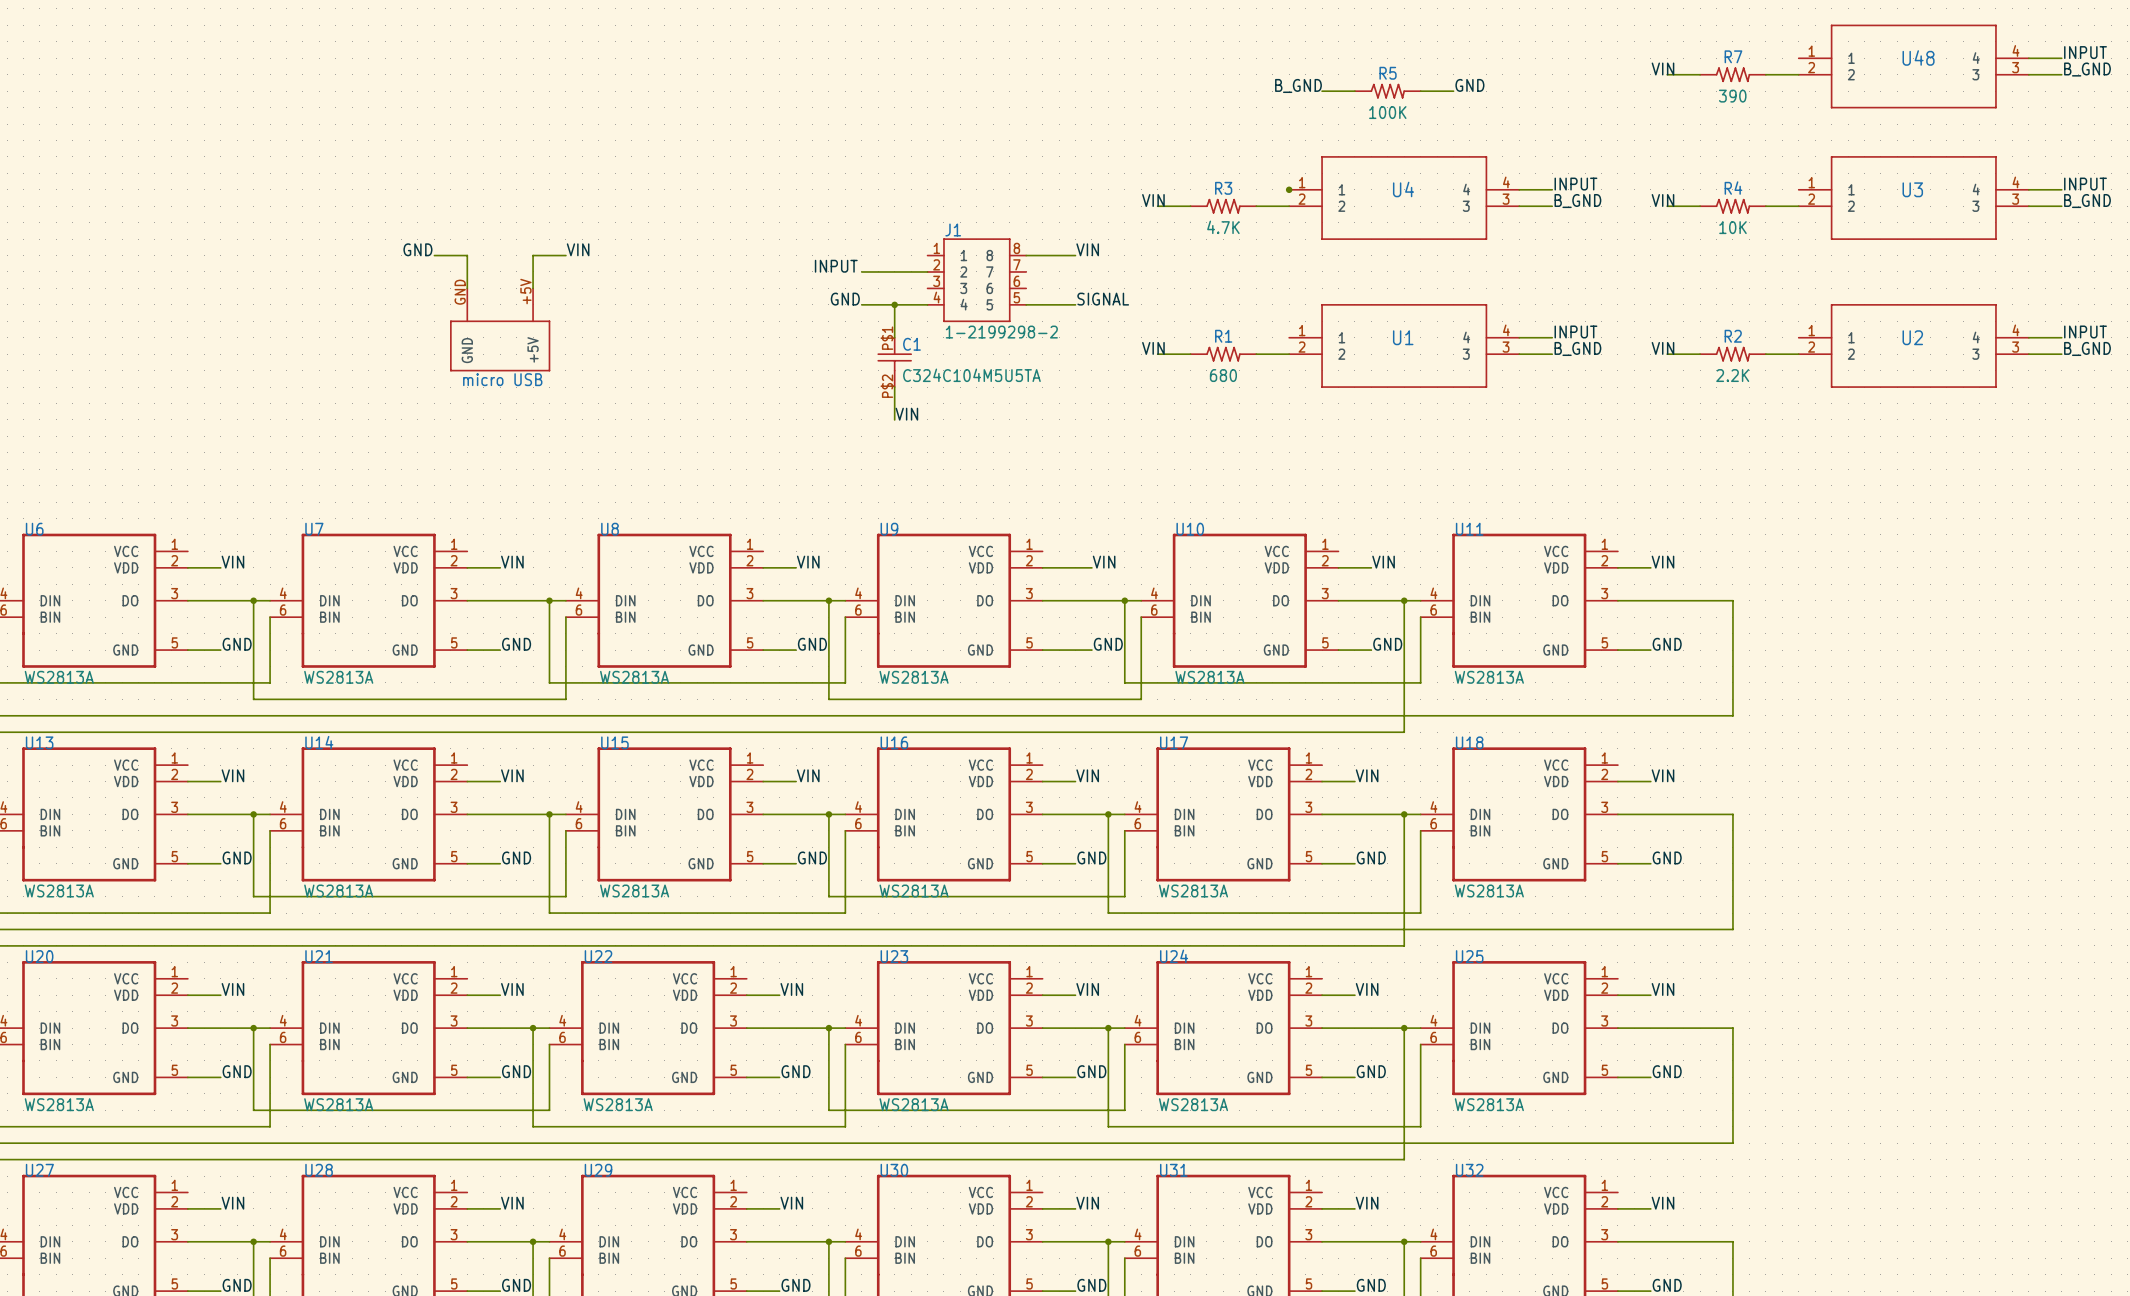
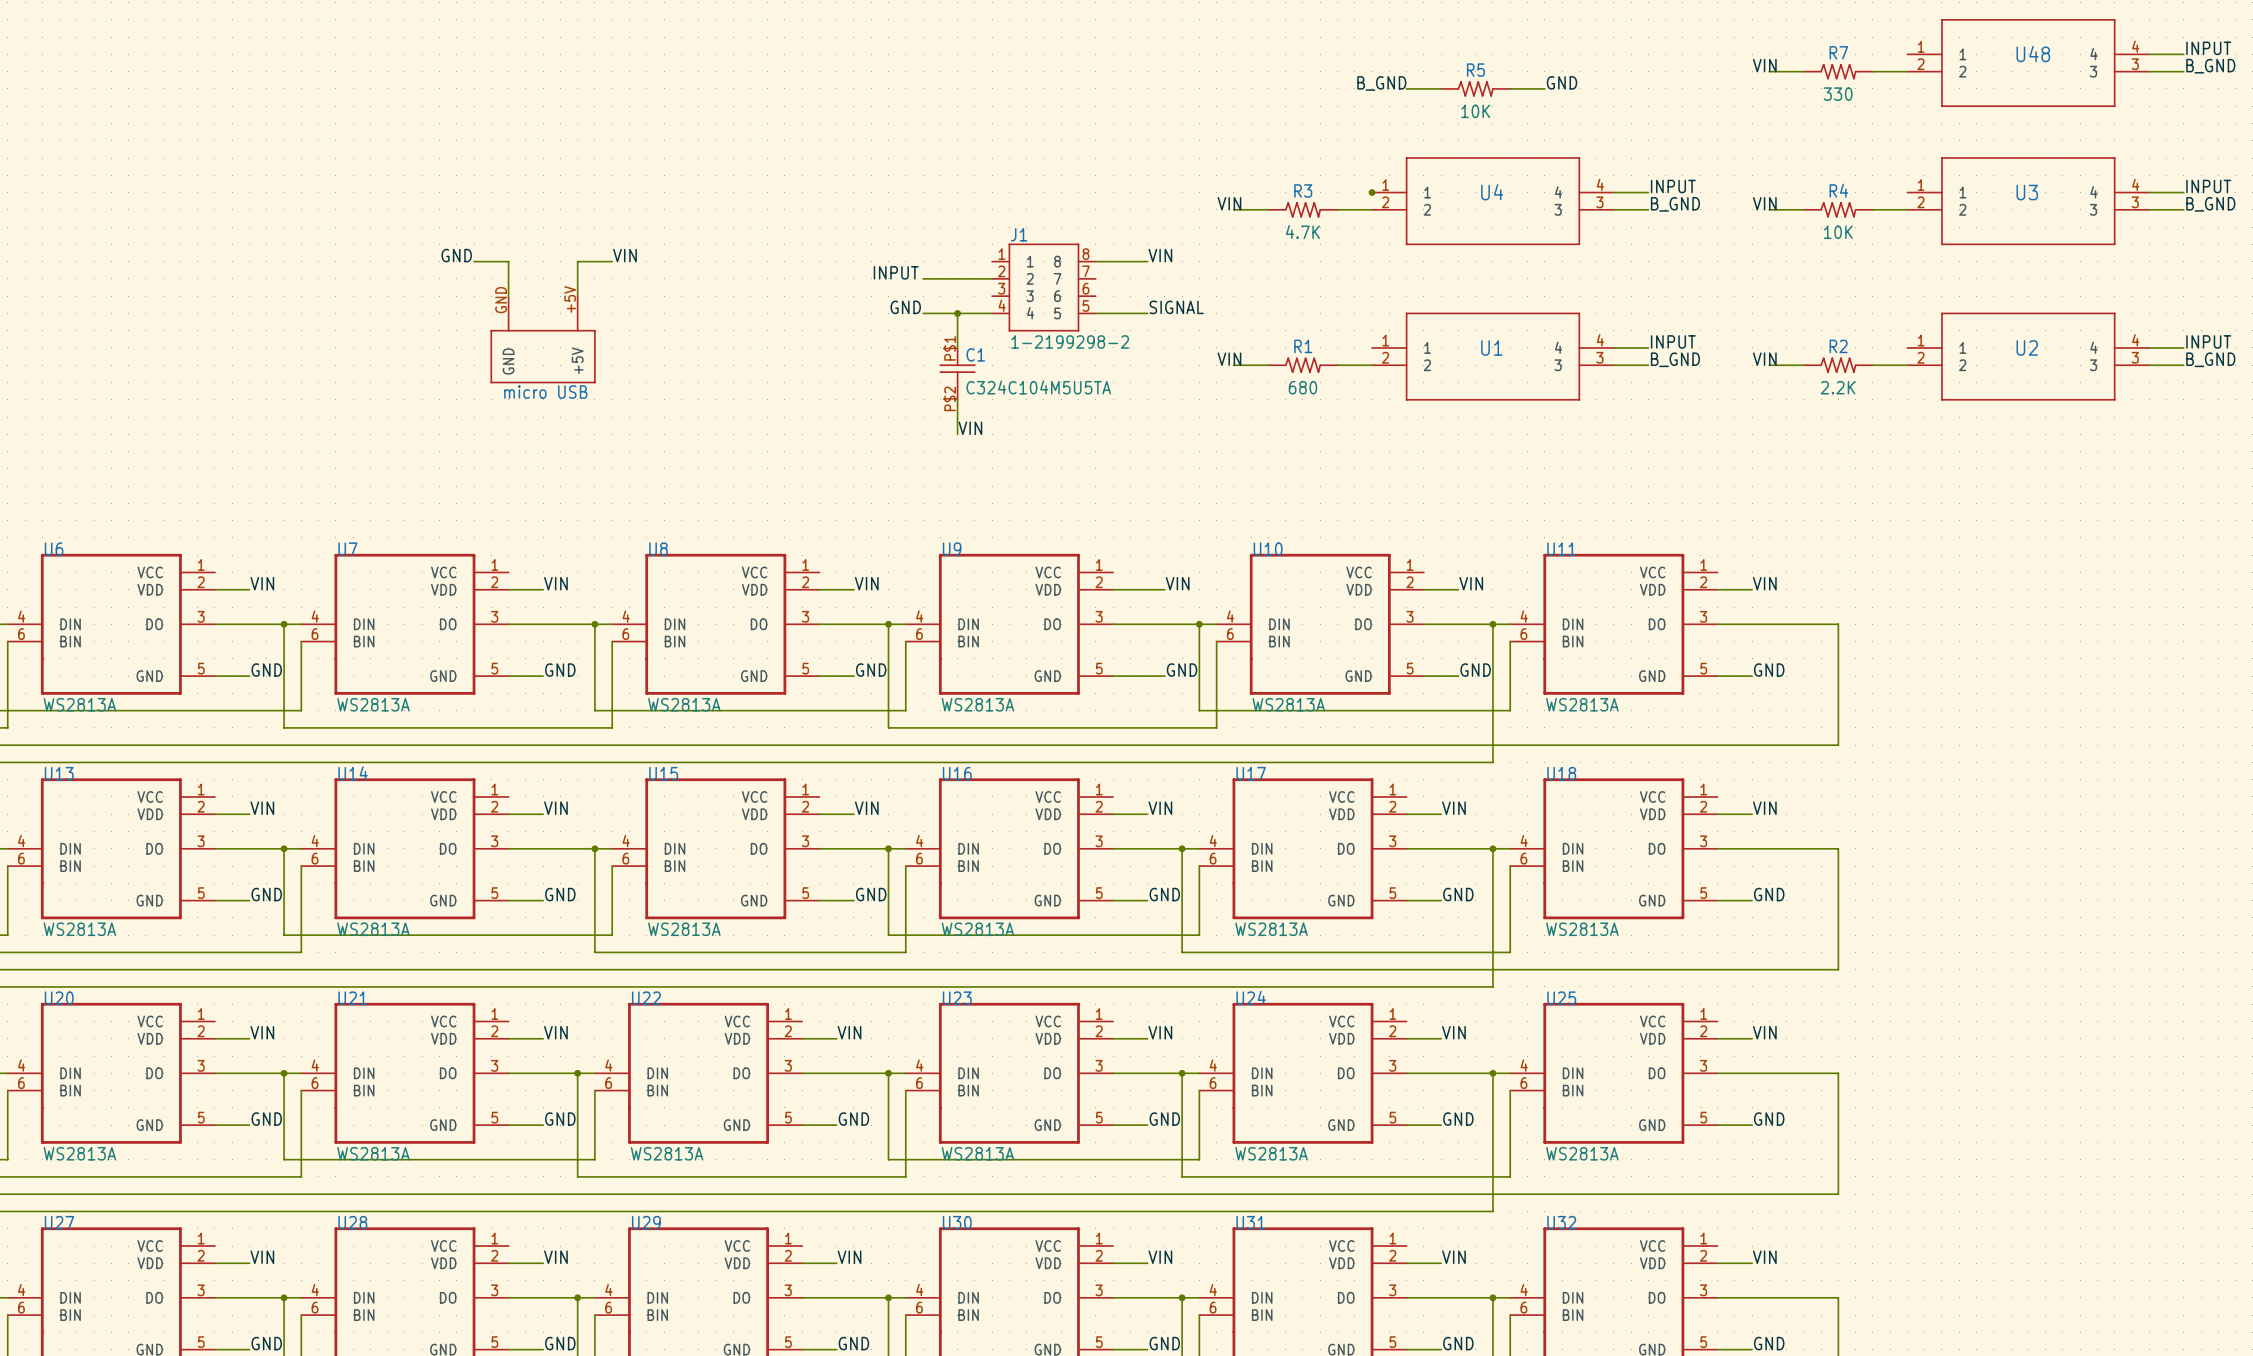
R7 value: 390 (1732, 96) -> 330 (1838, 94)
R5 value: 100K (1387, 112) -> 10K (1475, 111)

